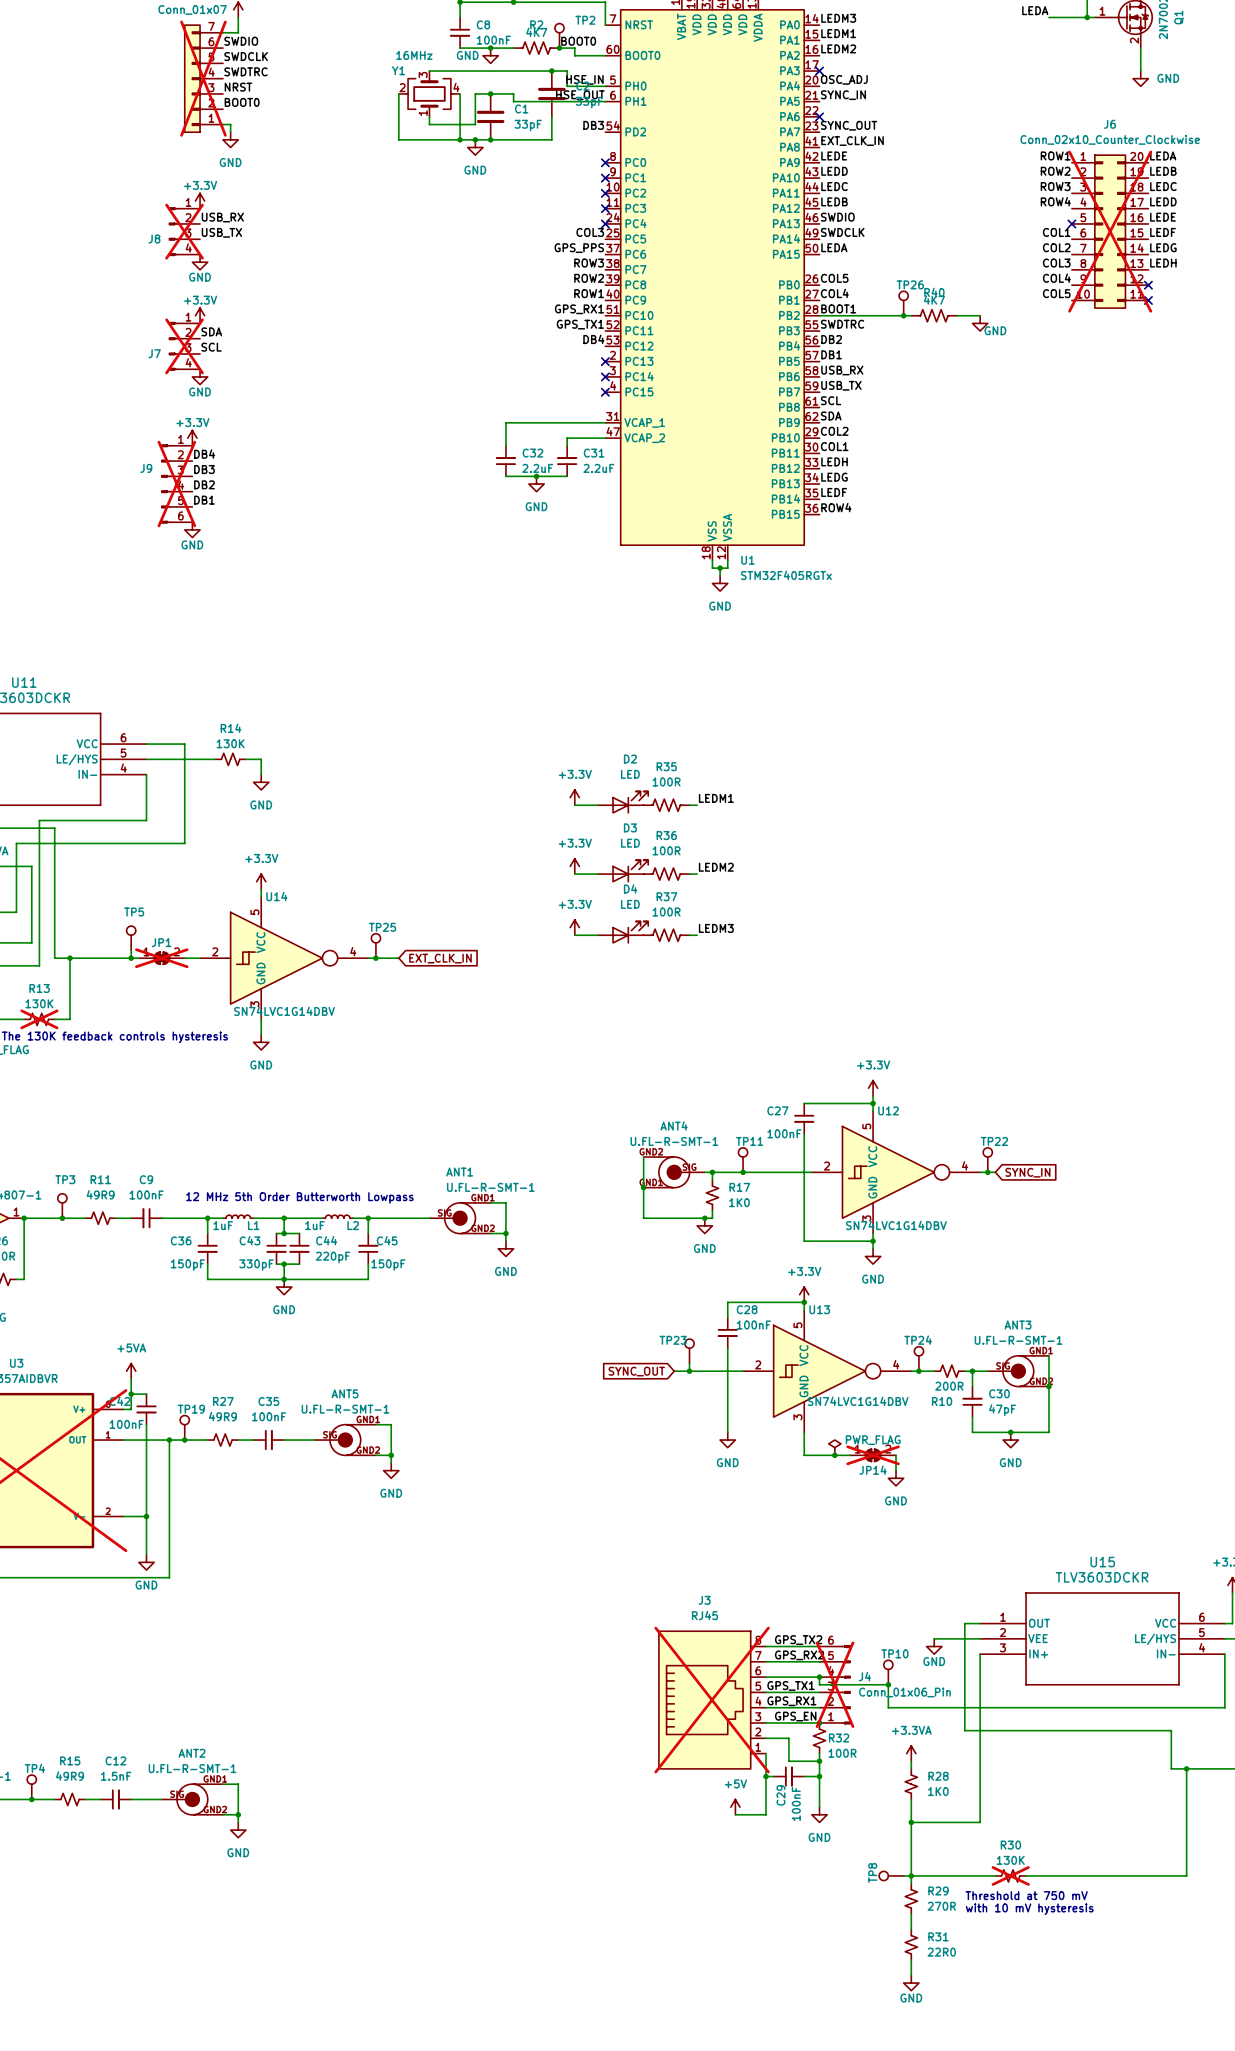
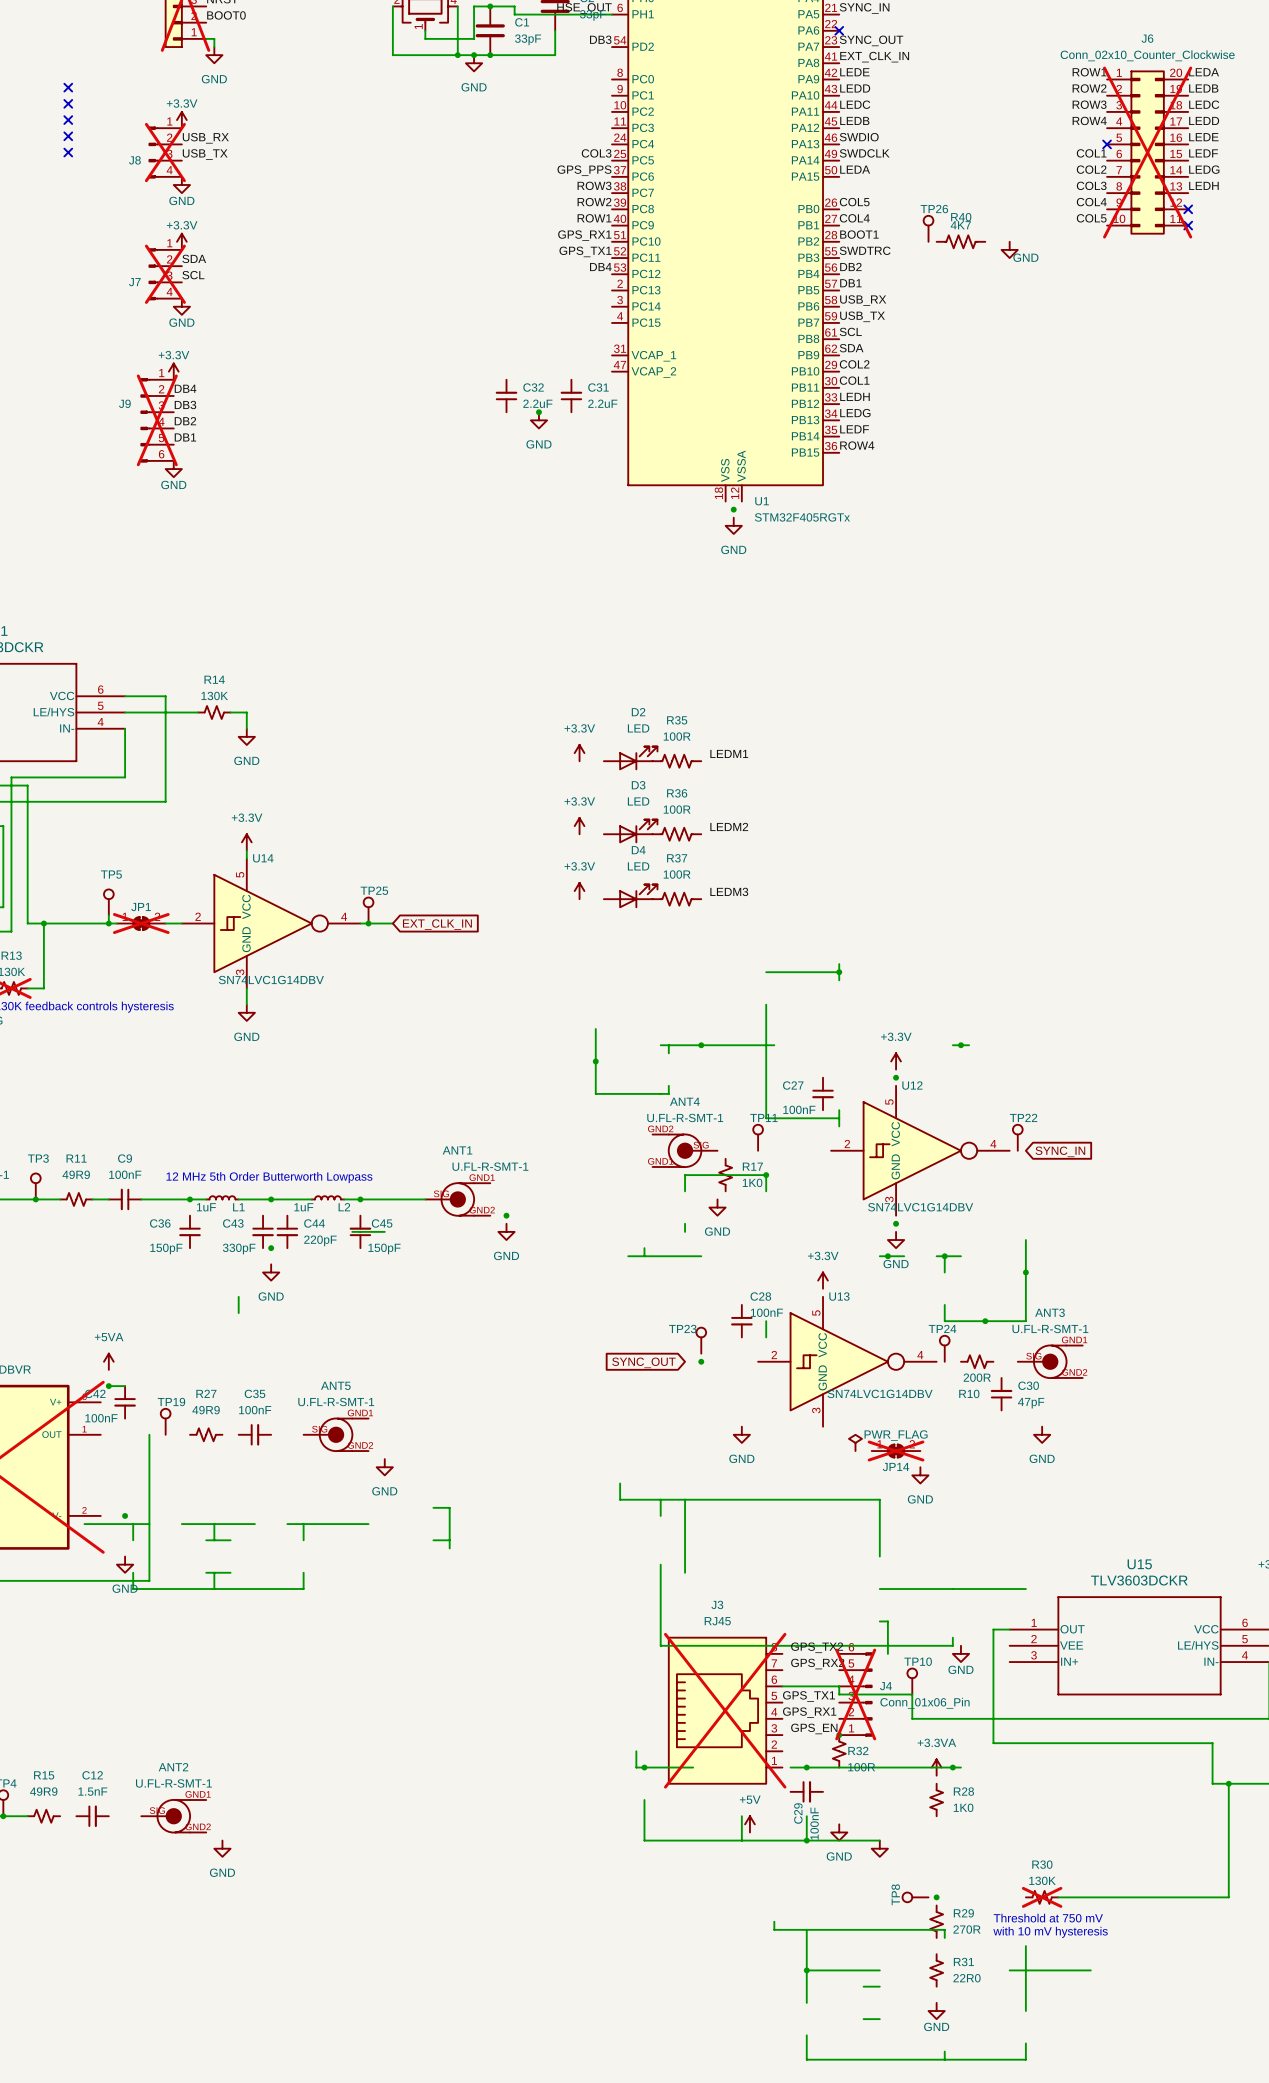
no-connect mark: (605, 162) -> none
no-connect mark: none -> (68, 87)
no-connect mark: (605, 178) -> none
no-connect mark: none -> (68, 103)
no-connect mark: (605, 193) -> none
no-connect mark: none -> (68, 120)
no-connect mark: (605, 208) -> none
no-connect mark: none -> (68, 136)
no-connect mark: (605, 223) -> none
no-connect mark: none -> (68, 152)
wire: (819, 315) (911, 315) -> none
junction: (903, 315) -> none
wire: (957, 315) (980, 315) -> none
no-connect mark: (605, 361) -> none
no-connect mark: (605, 376) -> none
no-connect mark: (605, 392) -> none
wire: (605, 422) (505, 422) (505, 445) -> none
wire: (605, 438) (567, 438) (567, 445) -> none
wire: (505, 476) (567, 476) -> none
wire: (712, 560) (712, 568) (727, 568) (727, 560) -> none
wire: (720, 568) (720, 575) -> none
wire: (574, 805) (597, 805) -> none
wire: (689, 805) (697, 805) -> none
wire: (574, 874) (597, 874) -> none
wire: (689, 874) (697, 874) -> none
wire: (574, 935) (597, 935) -> none
wire: (689, 935) (697, 935) -> none
junction: none -> (839, 972)
junction: none -> (701, 1045)
junction: none -> (960, 1045)
junction: none -> (595, 1061)
wire: (873, 1095) (873, 1111) -> (839, 964) (839, 980)
wire: (804, 1103) (873, 1103) -> (766, 972) (839, 972)
wire: (804, 1134) (804, 1241) (873, 1241) -> (766, 1004) (766, 1118) (839, 1118)
wire: (643, 1157) (643, 1218) (712, 1218) (712, 1210) -> (595, 1029) (595, 1093) (668, 1093) (668, 1085)
wire: (704, 1172) (811, 1172) -> (660, 1045) (774, 1045)
wire: (712, 1172) (712, 1179) -> (668, 1045) (668, 1053)
junction: (712, 1172) -> none
junction: (743, 1172) -> none
wire: (980, 1172) (995, 1172) -> (952, 1045) (969, 1045)
junction: (987, 1172) -> none
junction: (643, 1187) -> none
junction: none -> (766, 1175)
wire: (490, 1202) (505, 1202) (505, 1241) -> none
wire: none -> (685, 1191) (685, 1175) (766, 1175) (766, 1191)
wire: (207, 1218) (207, 1233) -> (238, 1296) (238, 1313)
wire: (284, 1218) (284, 1233) -> none
wire: (368, 1218) (368, 1233) -> none
junction: (704, 1218) -> none
wire: (276, 1233) (299, 1233) -> none
junction: (284, 1233) -> none
wire: (490, 1233) (505, 1233) -> none
wire: (873, 1233) (873, 1248) -> (839, 1110) (839, 1126)
wire: none -> (685, 1223) (685, 1231)
wire: none -> (352, 1231) (384, 1231)
wire: (207, 1264) (207, 1279) (368, 1279) (368, 1264) -> none
wire: (276, 1264) (299, 1264) -> none
wire: (284, 1264) (284, 1279) -> none
junction: none -> (887, 1256)
junction: none -> (944, 1256)
junction: (284, 1279) -> none
junction: none -> (1025, 1272)
junction: (804, 1302) -> none
wire: (804, 1310) (804, 1302) (727, 1302) (727, 1317) -> none
wire: none -> (766, 1321) (766, 1337)
junction: none -> (985, 1321)
wire: (727, 1348) (727, 1432) -> none
wire: (1048, 1355) (1048, 1432) (972, 1432) (972, 1417) -> (1025, 1240) (1025, 1321) (944, 1321) (944, 1304)
wire: (689, 1363) (689, 1371) -> (644, 1248) (644, 1256)
wire: (674, 1371) (743, 1371) -> (628, 1256) (701, 1256)
wire: (911, 1371) (934, 1371) -> (879, 1256) (904, 1256)
junction: (918, 1371) -> none
wire: (964, 1371) (987, 1371) -> (936, 1256) (960, 1256)
wire: (972, 1371) (972, 1386) -> (944, 1256) (944, 1272)
junction: (972, 1371) -> none
wire: (131, 1378) (131, 1409) (123, 1409) -> none
junction: (1048, 1386) -> none
wire: (146, 1424) (146, 1554) -> none
wire: (375, 1424) (391, 1424) (391, 1462) -> (433, 1507) (449, 1507) (449, 1548)
wire: (804, 1432) (804, 1455) (850, 1455) -> none
junction: (1010, 1432) -> none
wire: (123, 1440) (207, 1440) -> none
junction: (169, 1440) -> none
junction: (184, 1440) -> none
wire: (238, 1440) (253, 1440) -> none
wire: (284, 1440) (314, 1440) -> none
wire: (375, 1455) (391, 1455) -> (433, 1540) (449, 1540)
junction: (391, 1455) -> none
junction: (834, 1455) -> none
wire: (896, 1455) (896, 1470) -> none
wire: none -> (620, 1483) (620, 1499) (879, 1499) (879, 1556)
wire: none -> (660, 1499) (660, 1515)
wire: none -> (685, 1499) (685, 1572)
wire: (123, 1516) (146, 1516) -> (206, 1540) (230, 1540)
wire: none -> (84, 1524) (149, 1524)
wire: none -> (133, 1524) (133, 1540)
wire: none -> (181, 1524) (254, 1524)
wire: none -> (214, 1524) (214, 1540)
wire: none -> (287, 1524) (368, 1524)
wire: none -> (303, 1524) (303, 1540)
wire: none -> (660, 1564) (660, 1645) (952, 1645) (952, 1637)
wire: none -> (133, 1572) (133, 1588) (303, 1588) (303, 1572)
wire: none -> (206, 1572) (230, 1572)
wire: none -> (214, 1572) (214, 1588)
wire: none -> (879, 1588) (1025, 1588)
wire: none -> (879, 1621) (887, 1621) (887, 1653)
wire: (934, 1638) (980, 1638) -> none
wire: (765, 1646) (819, 1646) -> none
wire: (980, 1654) (980, 1822) (911, 1822) -> none
wire: (765, 1661) (819, 1661) -> none
junction: (819, 1677) -> none
junction: (888, 1684) -> none
wire: (765, 1692) (819, 1692) -> none
wire: (765, 1707) (819, 1707) -> none
wire: (765, 1723) (819, 1723) -> none
wire: none -> (636, 1751) (636, 1767) (693, 1767)
wire: (765, 1738) (788, 1738) (788, 1761) (819, 1761) -> none
junction: none -> (644, 1767)
wire: (765, 1753) (765, 1814) (735, 1814) -> none
wire: none -> (790, 1767) (960, 1767)
junction: none -> (806, 1767)
wire: (819, 1753) (819, 1807) -> none
junction: none -> (952, 1767)
junction: (819, 1761) -> none
wire: (911, 1761) (911, 1768) -> none
wire: (765, 1776) (773, 1776) -> none
junction: (765, 1776) -> none
wire: (804, 1776) (819, 1776) -> none
junction: (819, 1776) -> none
wire: (222, 1784) (238, 1784) (238, 1822) -> none
wire: none -> (644, 1800) (644, 1840) (879, 1840)
wire: (85, 1799) (100, 1799) -> none
wire: (131, 1799) (161, 1799) -> none
wire: none -> (741, 1816) (741, 1840)
wire: none -> (806, 1816) (806, 1840)
wire: (911, 1799) (911, 1883) -> none
wire: (222, 1814) (238, 1814) -> none
junction: (238, 1814) -> none
junction: none -> (806, 1840)
junction: (911, 1822) -> none
power symbol: none -> (879, 1848)
wire: (903, 1875) (995, 1875) -> none
wire: none -> (774, 1921) (774, 1929) (944, 1929) (944, 1937)
wire: none -> (806, 1929) (806, 2002)
wire: (911, 1914) (911, 1929) -> none
wire: none -> (1025, 1946) (1025, 2011)
wire: none -> (806, 1970) (879, 1970)
junction: none -> (806, 1970)
wire: none -> (1009, 1970) (1090, 1970)
wire: none -> (863, 1986) (879, 1986)
wire: (911, 1960) (911, 1975) -> none
wire: none -> (863, 2019) (879, 2019)
wire: none -> (806, 2035) (806, 2059) (1025, 2059) (1025, 2043)
wire: none -> (944, 2051) (944, 2059)

